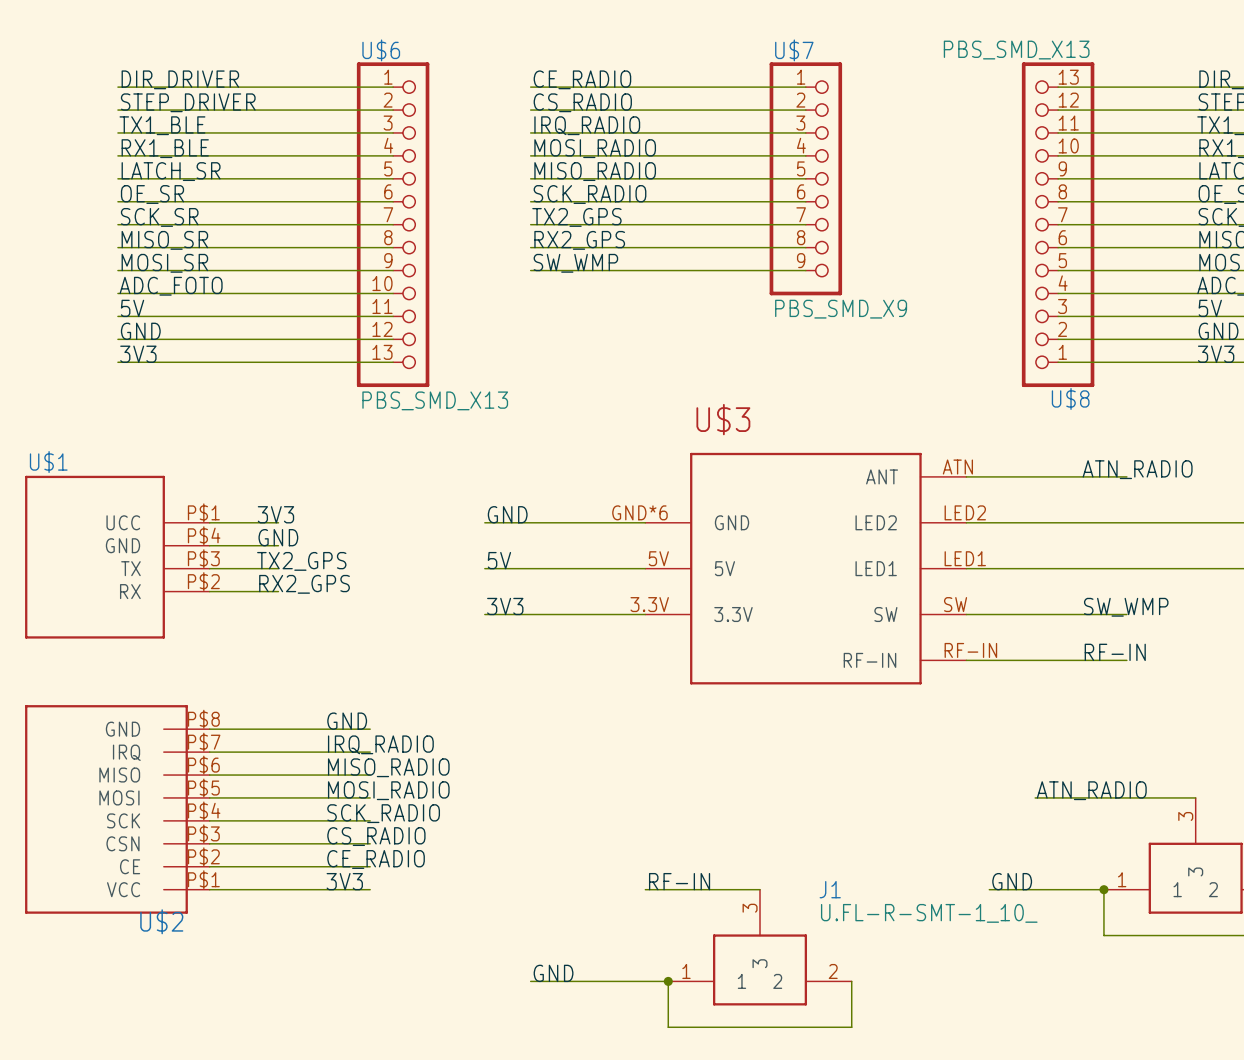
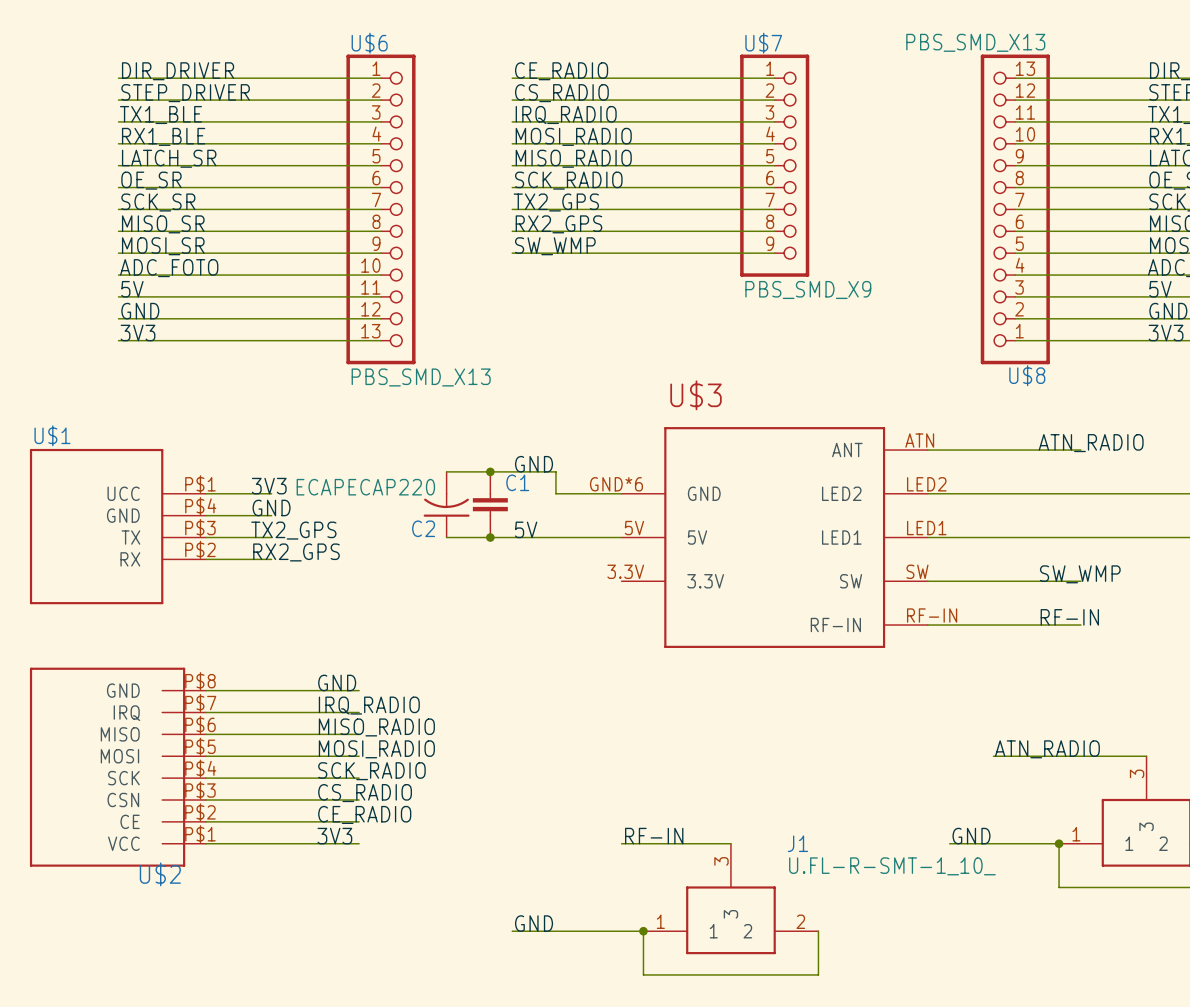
junction: none -> (490, 471)
label position: GND (507, 514) -> GND (534, 464)
wire: (484, 522) (576, 522) -> (446, 471) (555, 471) (555, 493)
C2: none -> ECAPECAP220 (446, 504)
C1: none -> (490, 504)
label position: 5V (499, 560) -> 5V (526, 529)
wire: none -> (446, 537) (468, 537)
junction: none -> (490, 537)
label: 3V3 (505, 606) -> none
wire: (484, 614) (645, 614) -> none

